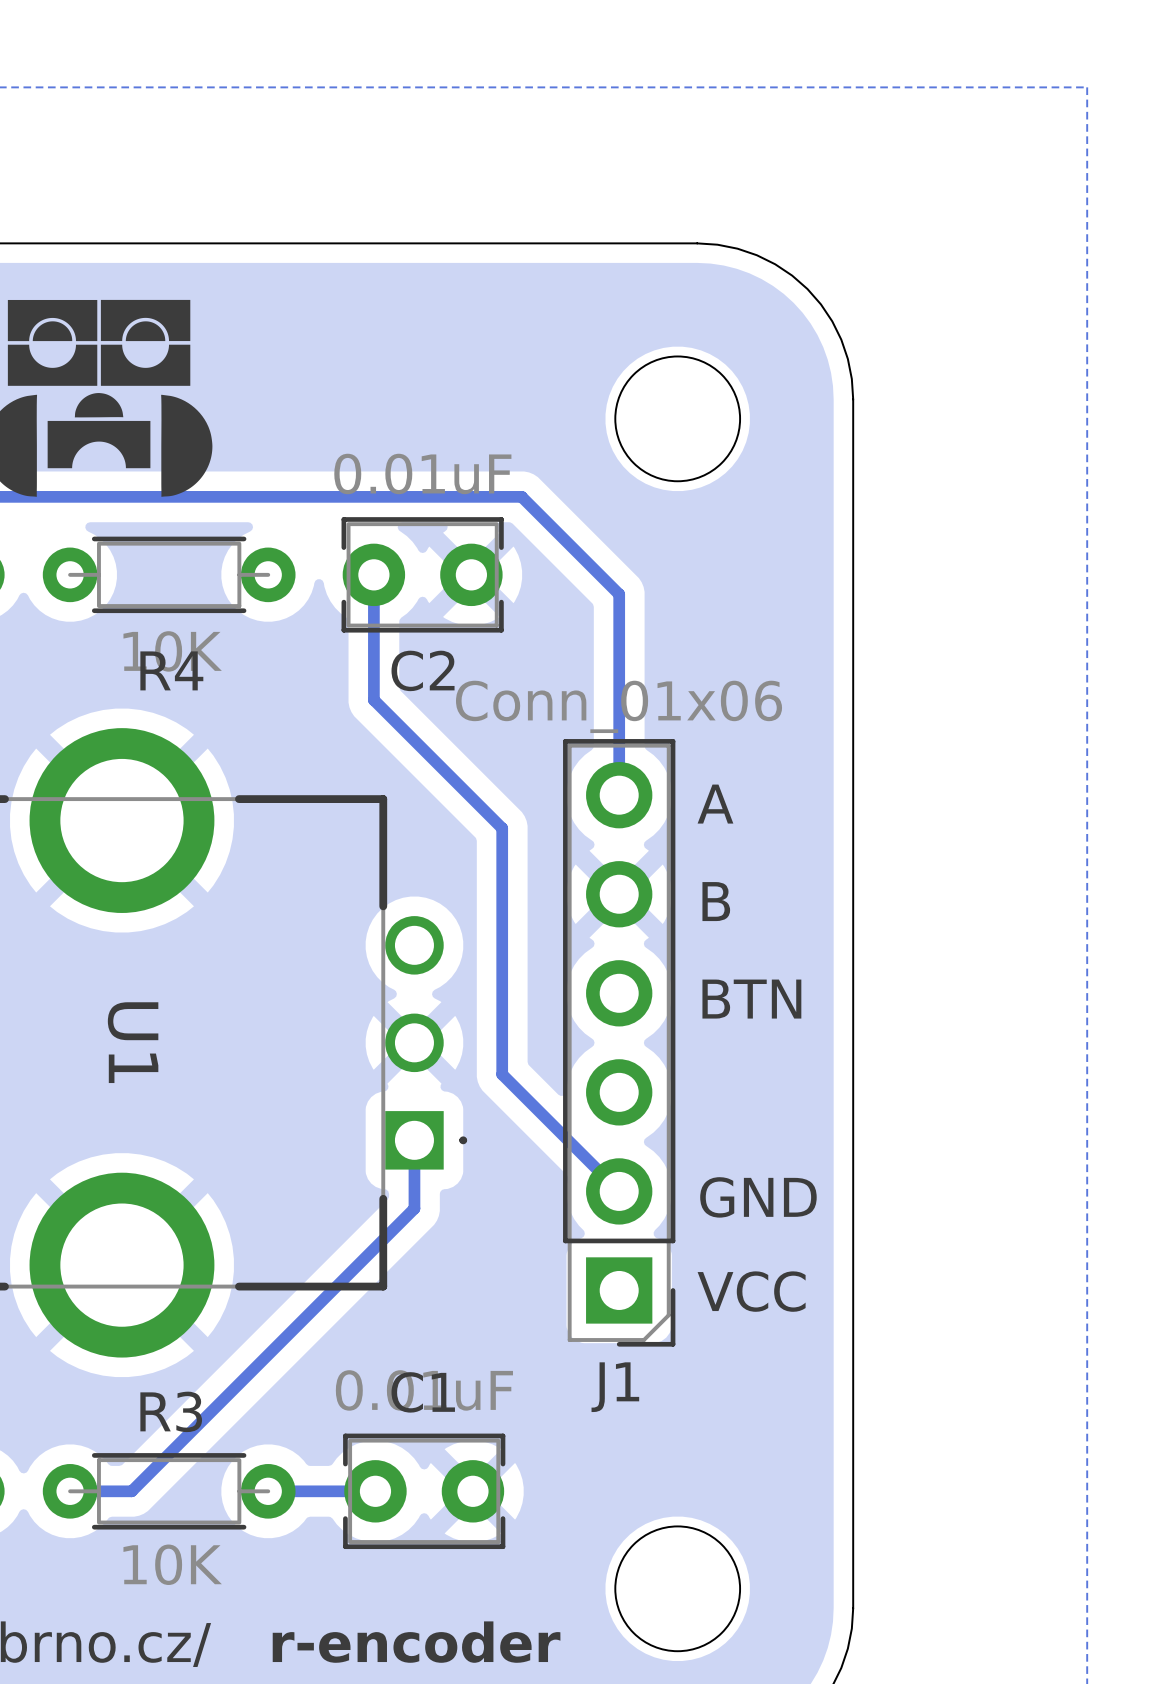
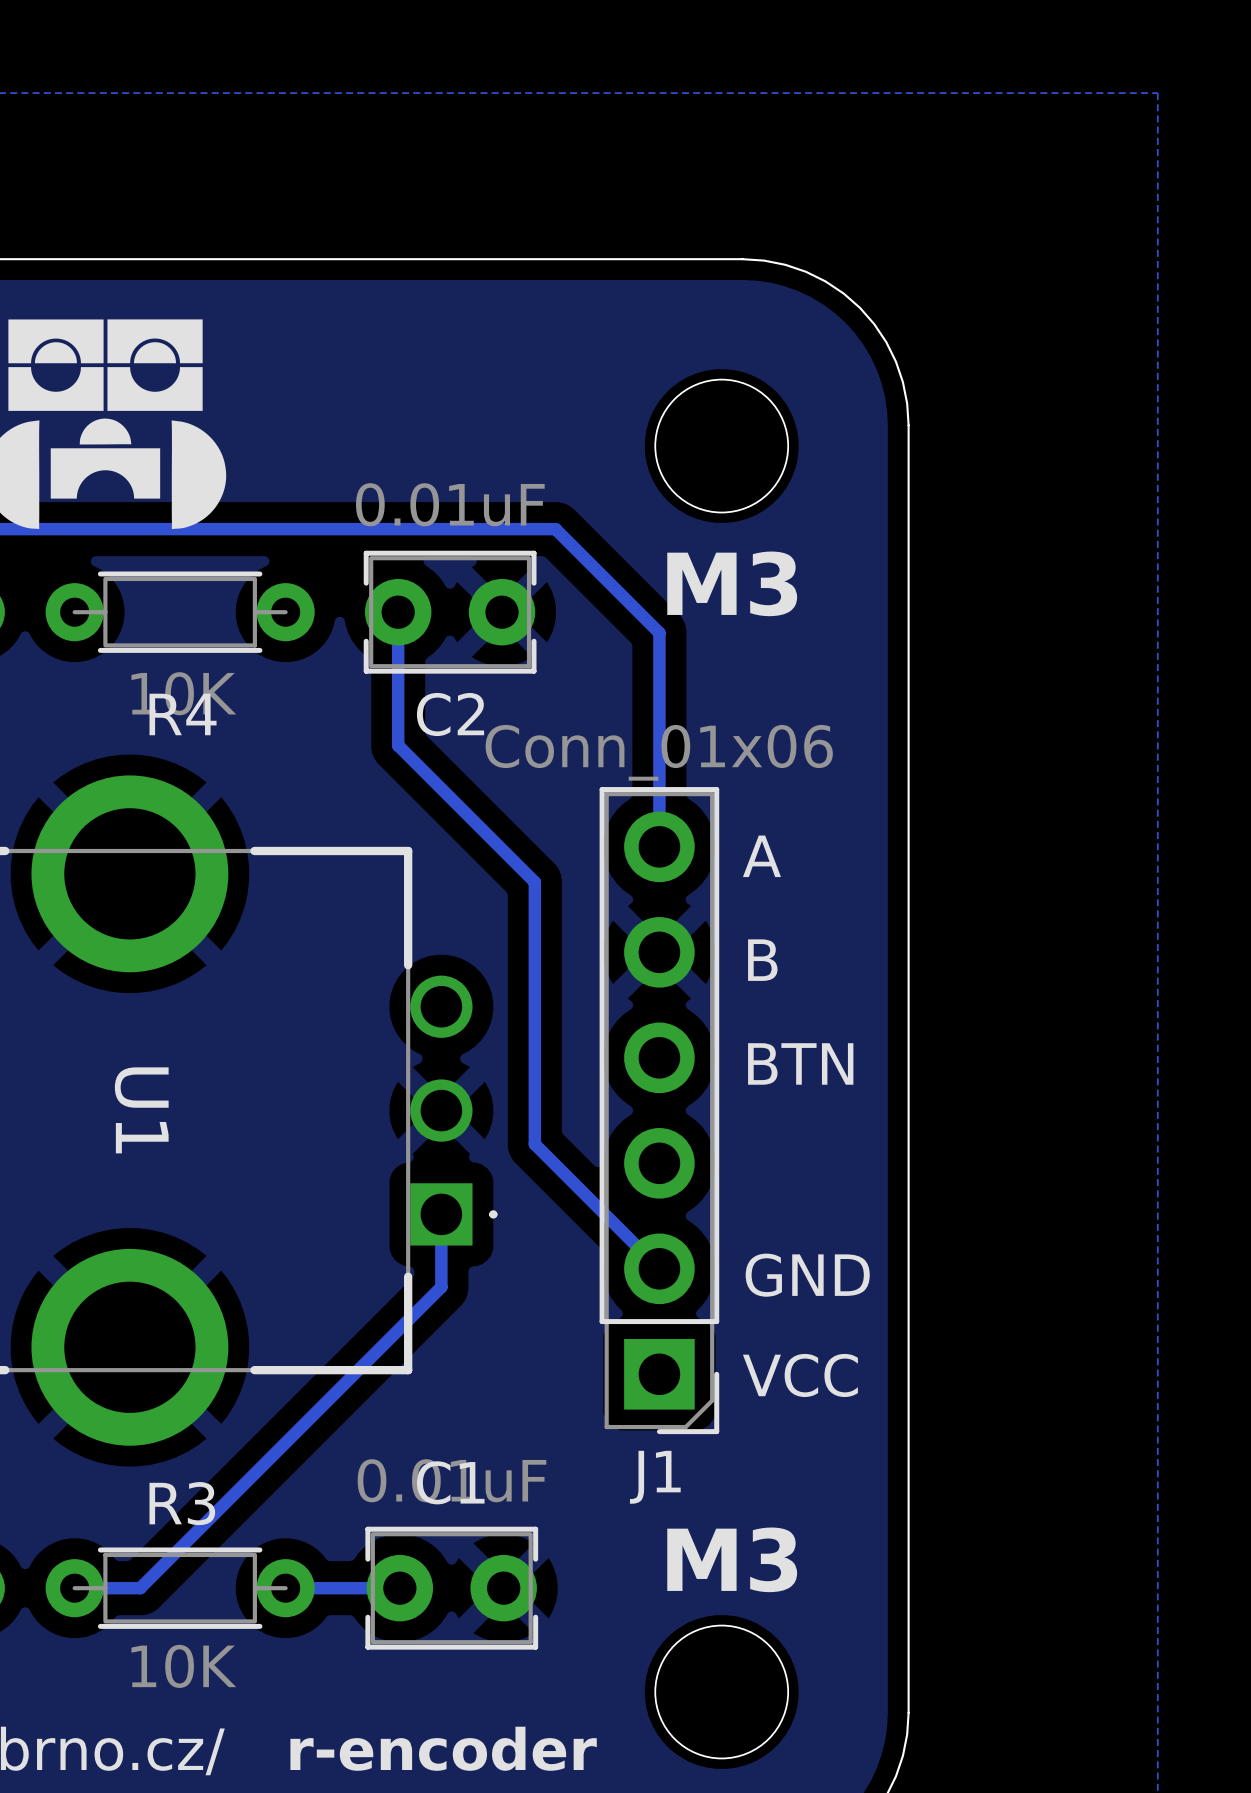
text: none -> M3 (732, 583)
text: none -> M3 (732, 1559)

